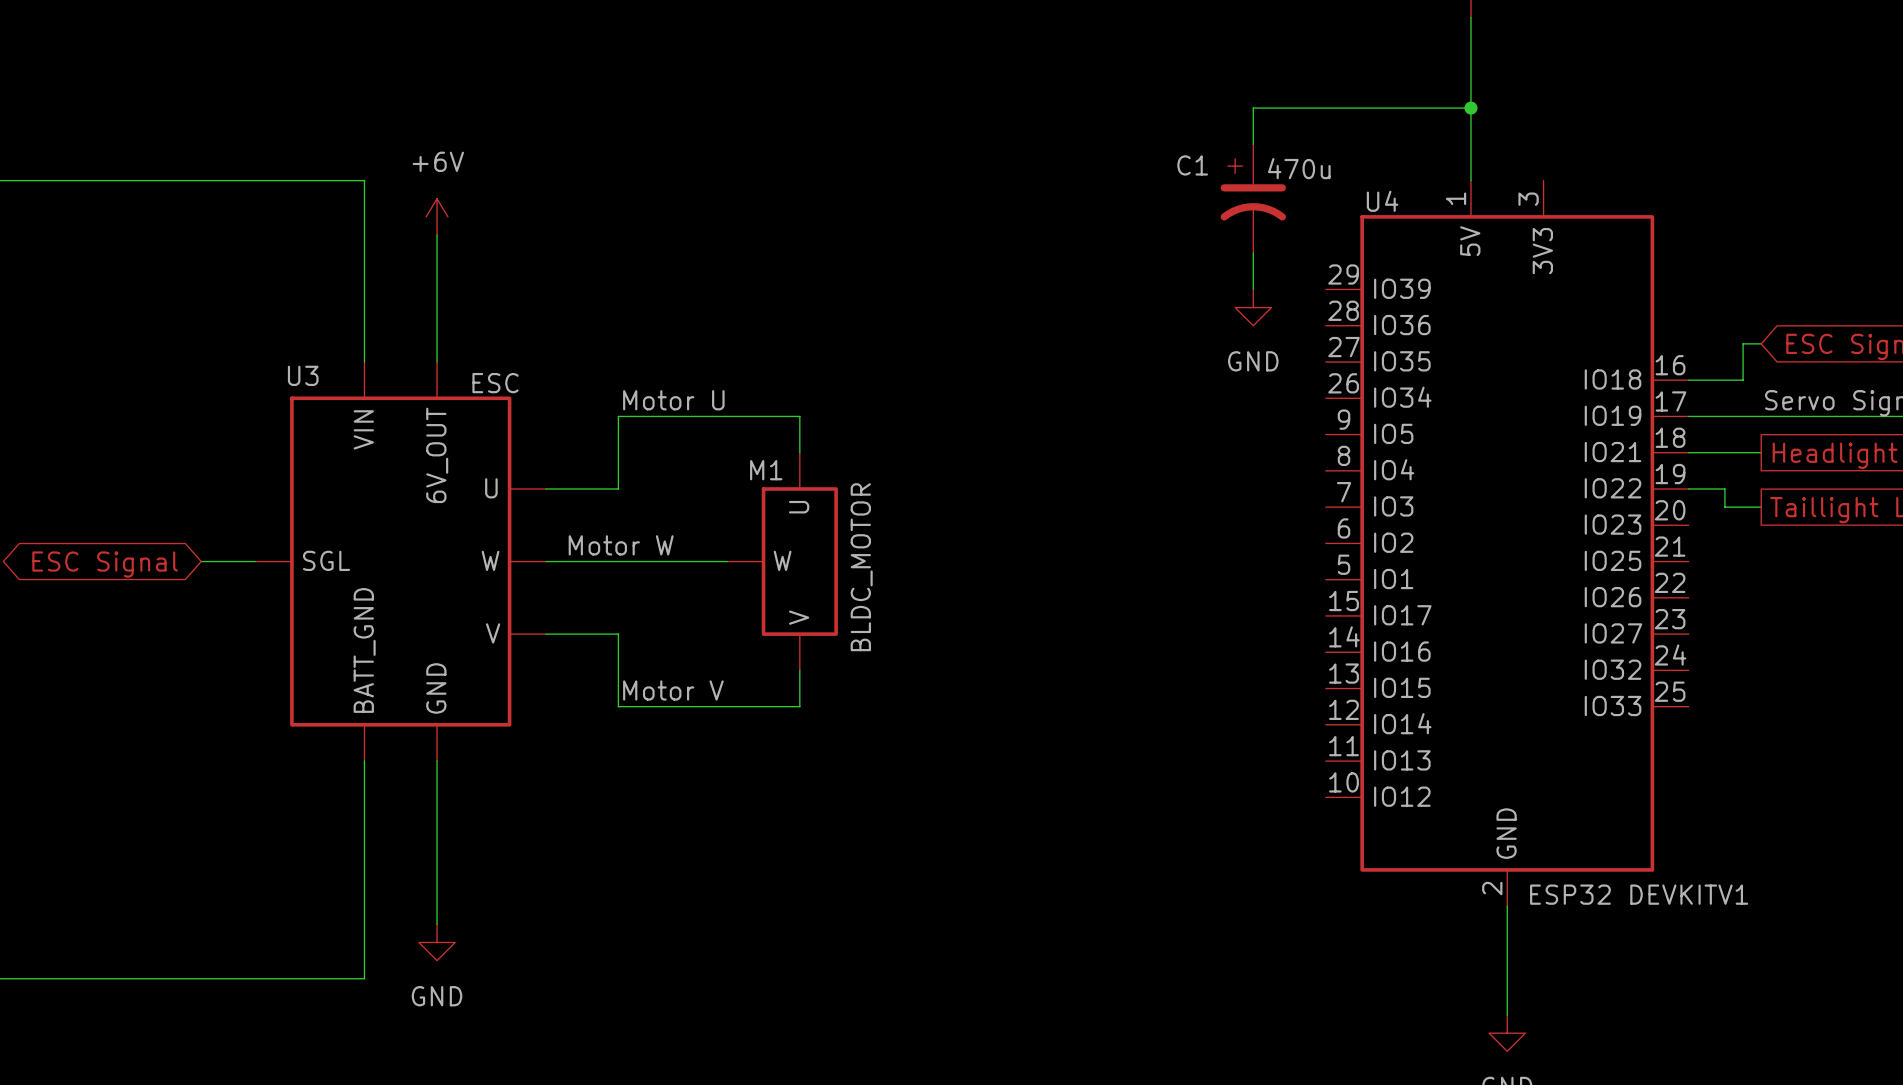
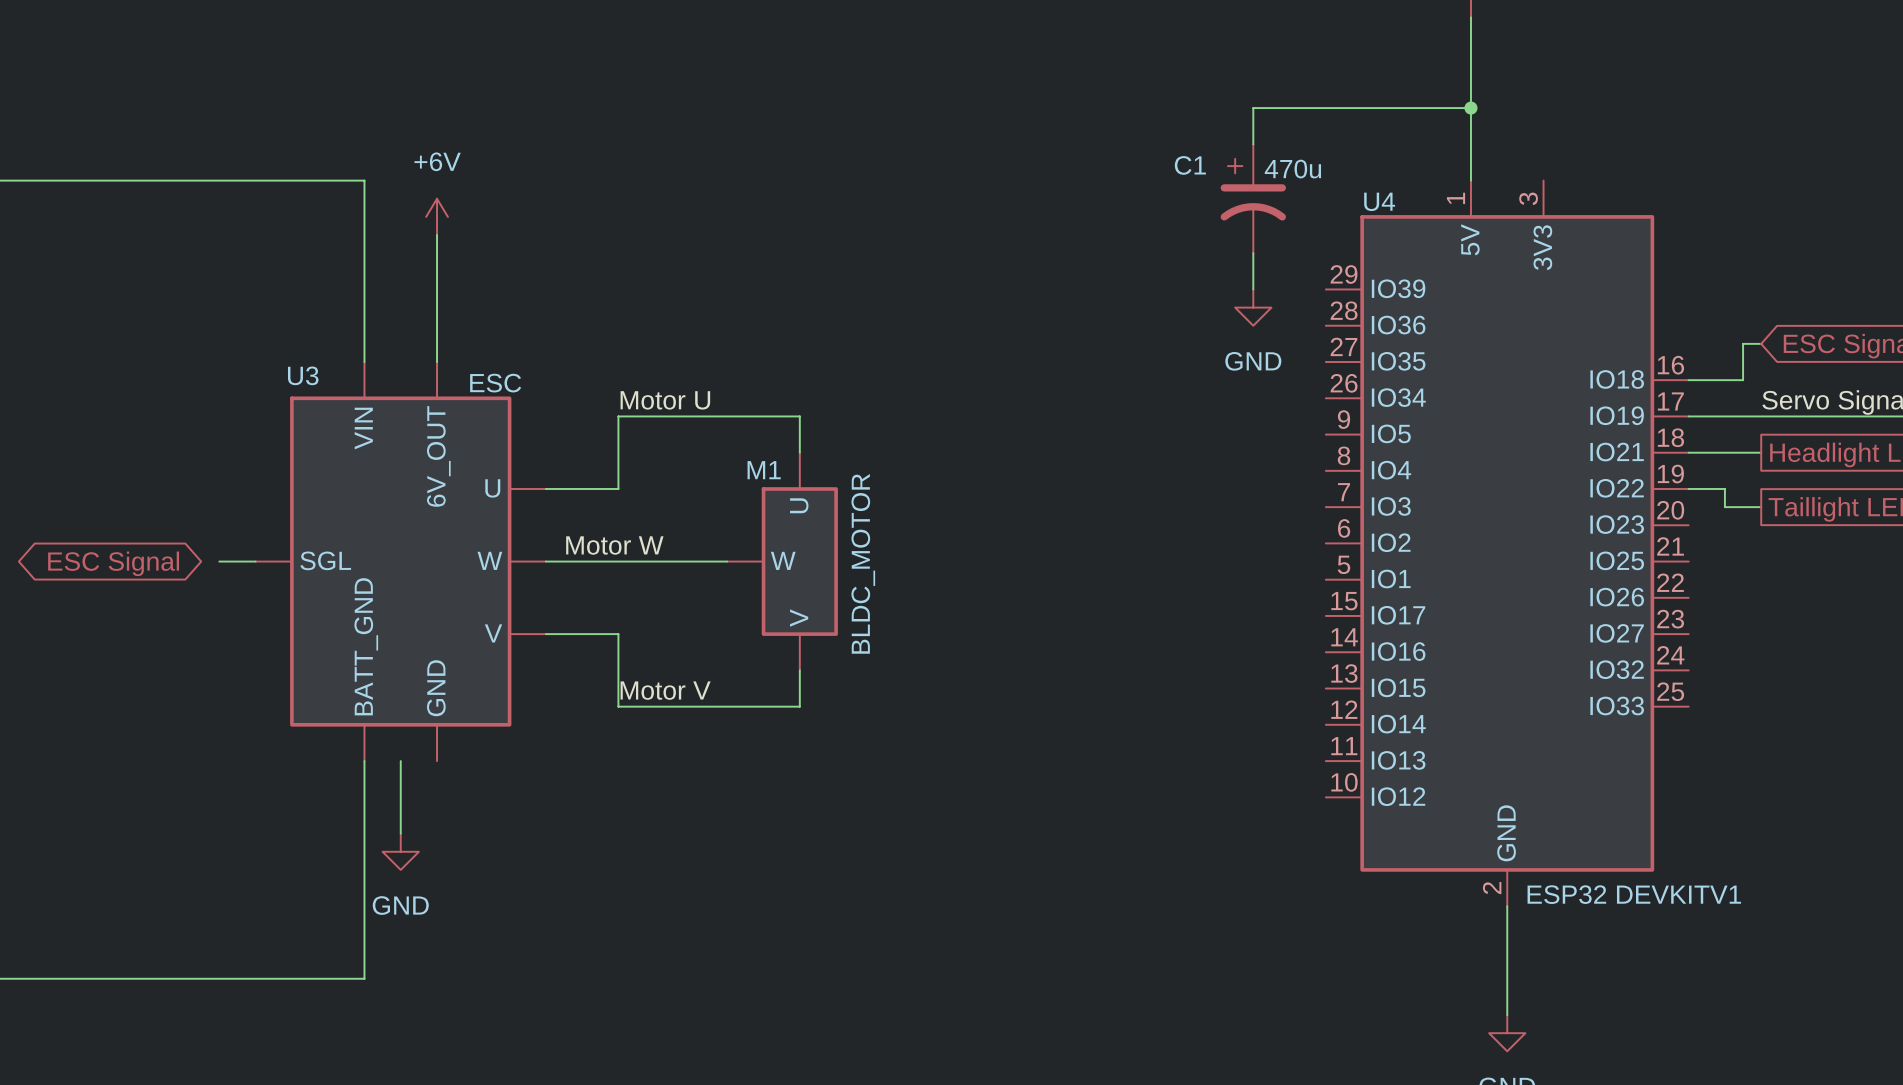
wire: (201, 561) (219, 561) -> none
wire: none -> (400, 761) (400, 833)
wire: (437, 761) (437, 924) -> none
power symbol position: GND (437, 942) -> GND (400, 851)

